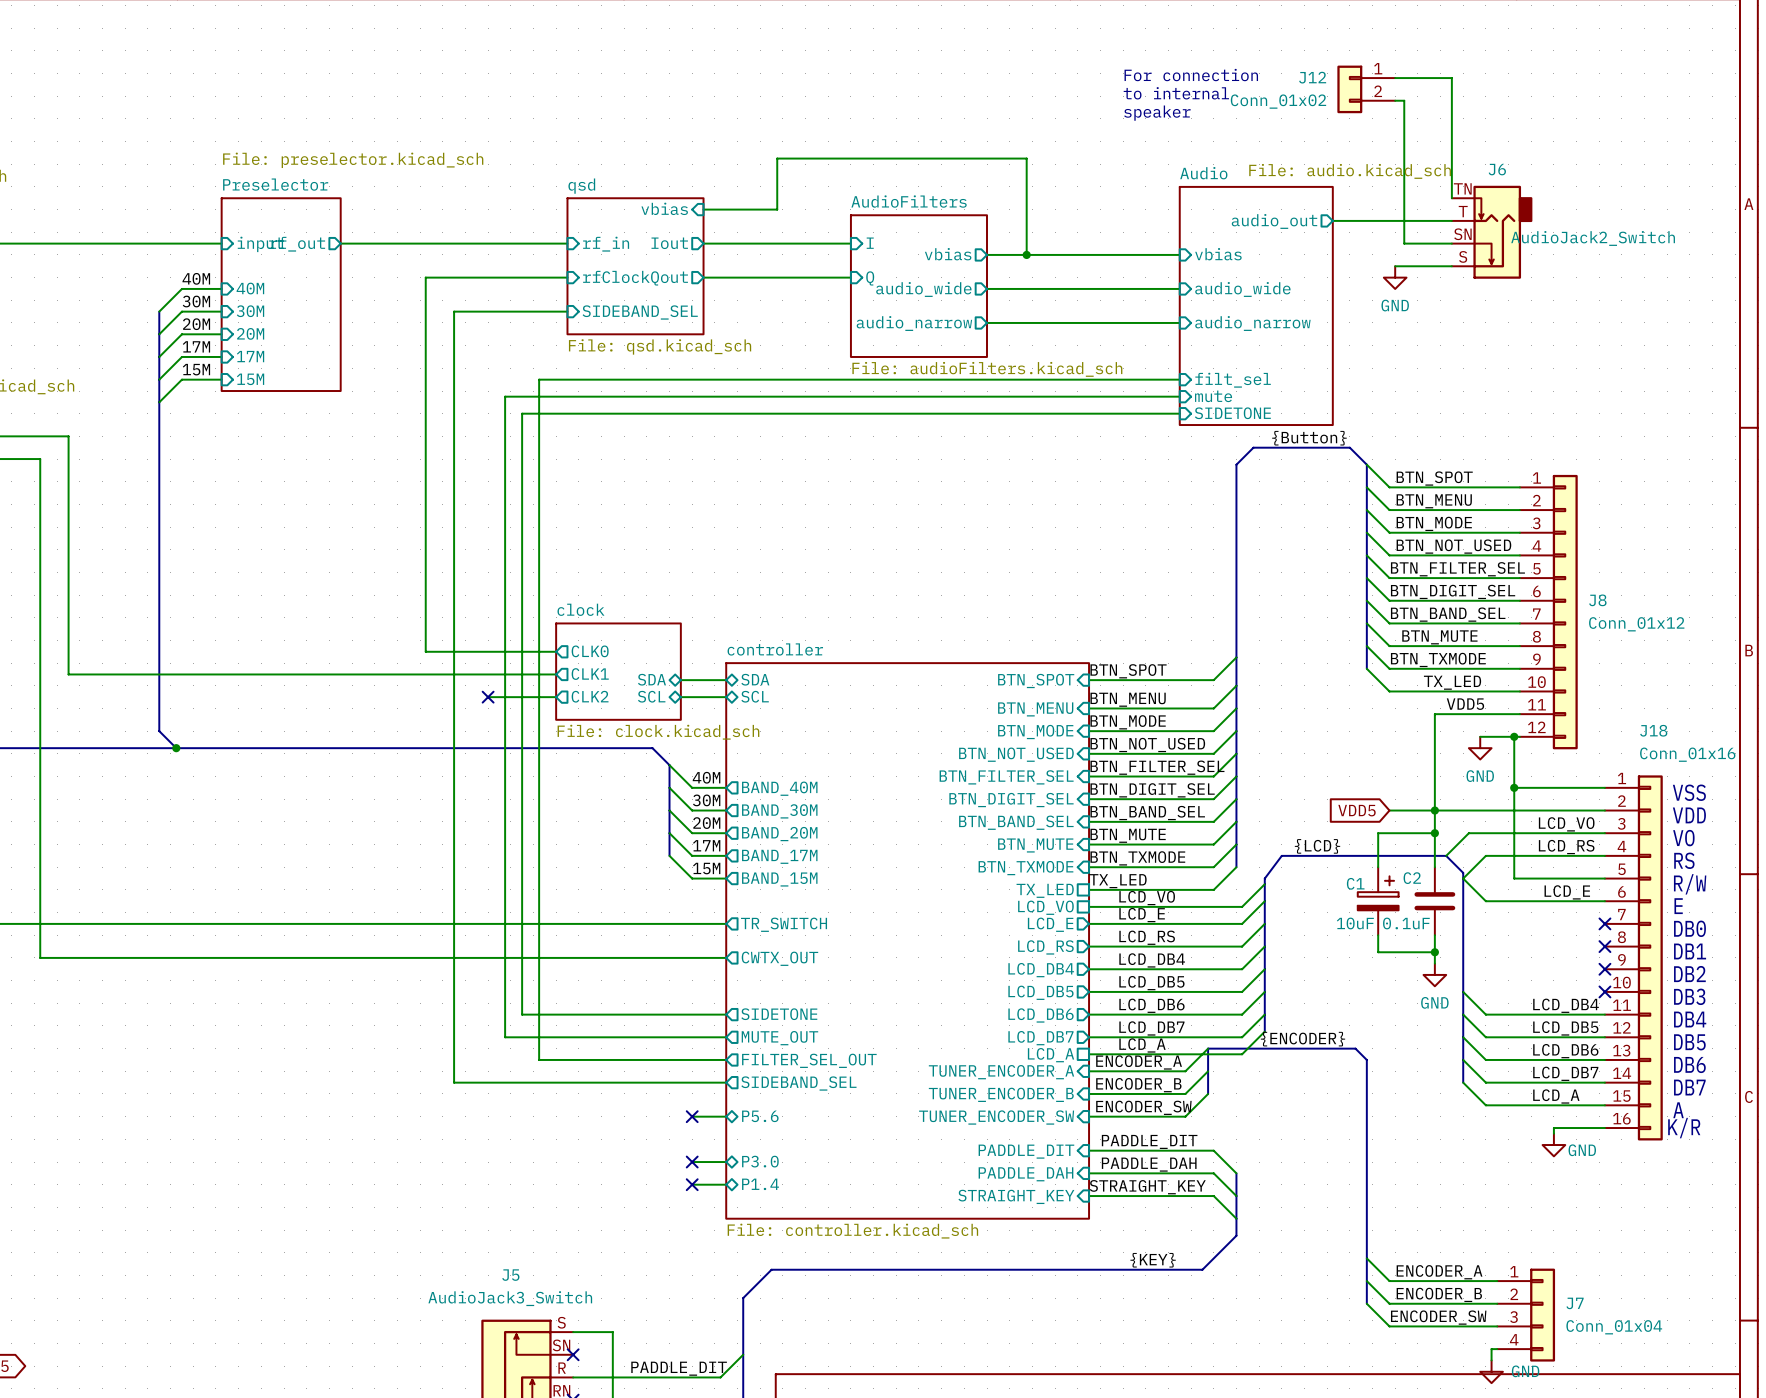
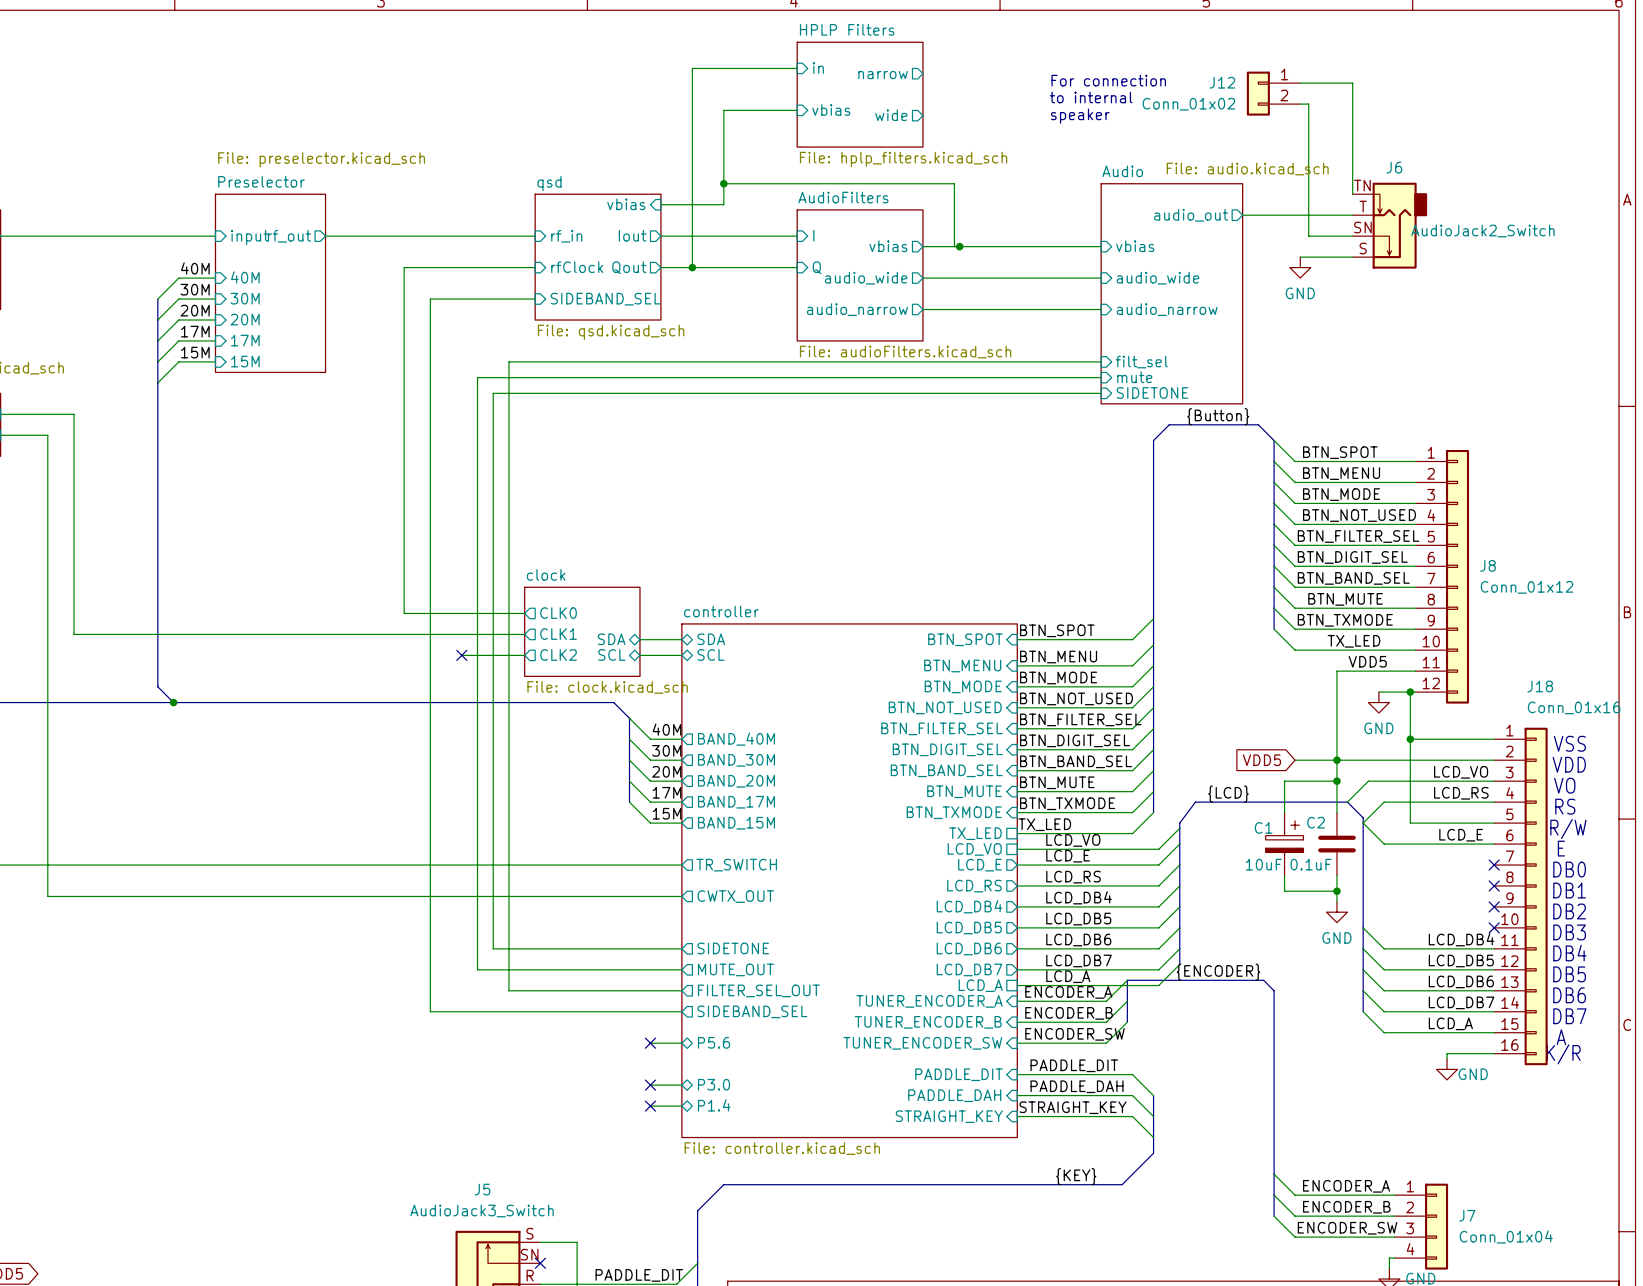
sheet pin: none -> in (818, 68)
wire: none -> (797, 68) (692, 68) (692, 267)
sheet pin: none -> narrow (883, 75)
sheet HPLP Filters: none -> File: hplp_filters.kicad_sch (860, 94)
sheet pin: none -> vbias (831, 109)
sheet pin: none -> wide (891, 115)
wire: none -> (723, 183) (954, 183) (954, 246)
junction: none -> (723, 183)
wire: (771, 209) (777, 209) (777, 158) (1026, 158) (1026, 254) -> (723, 204) (723, 110) (797, 110)
junction: none -> (692, 267)

